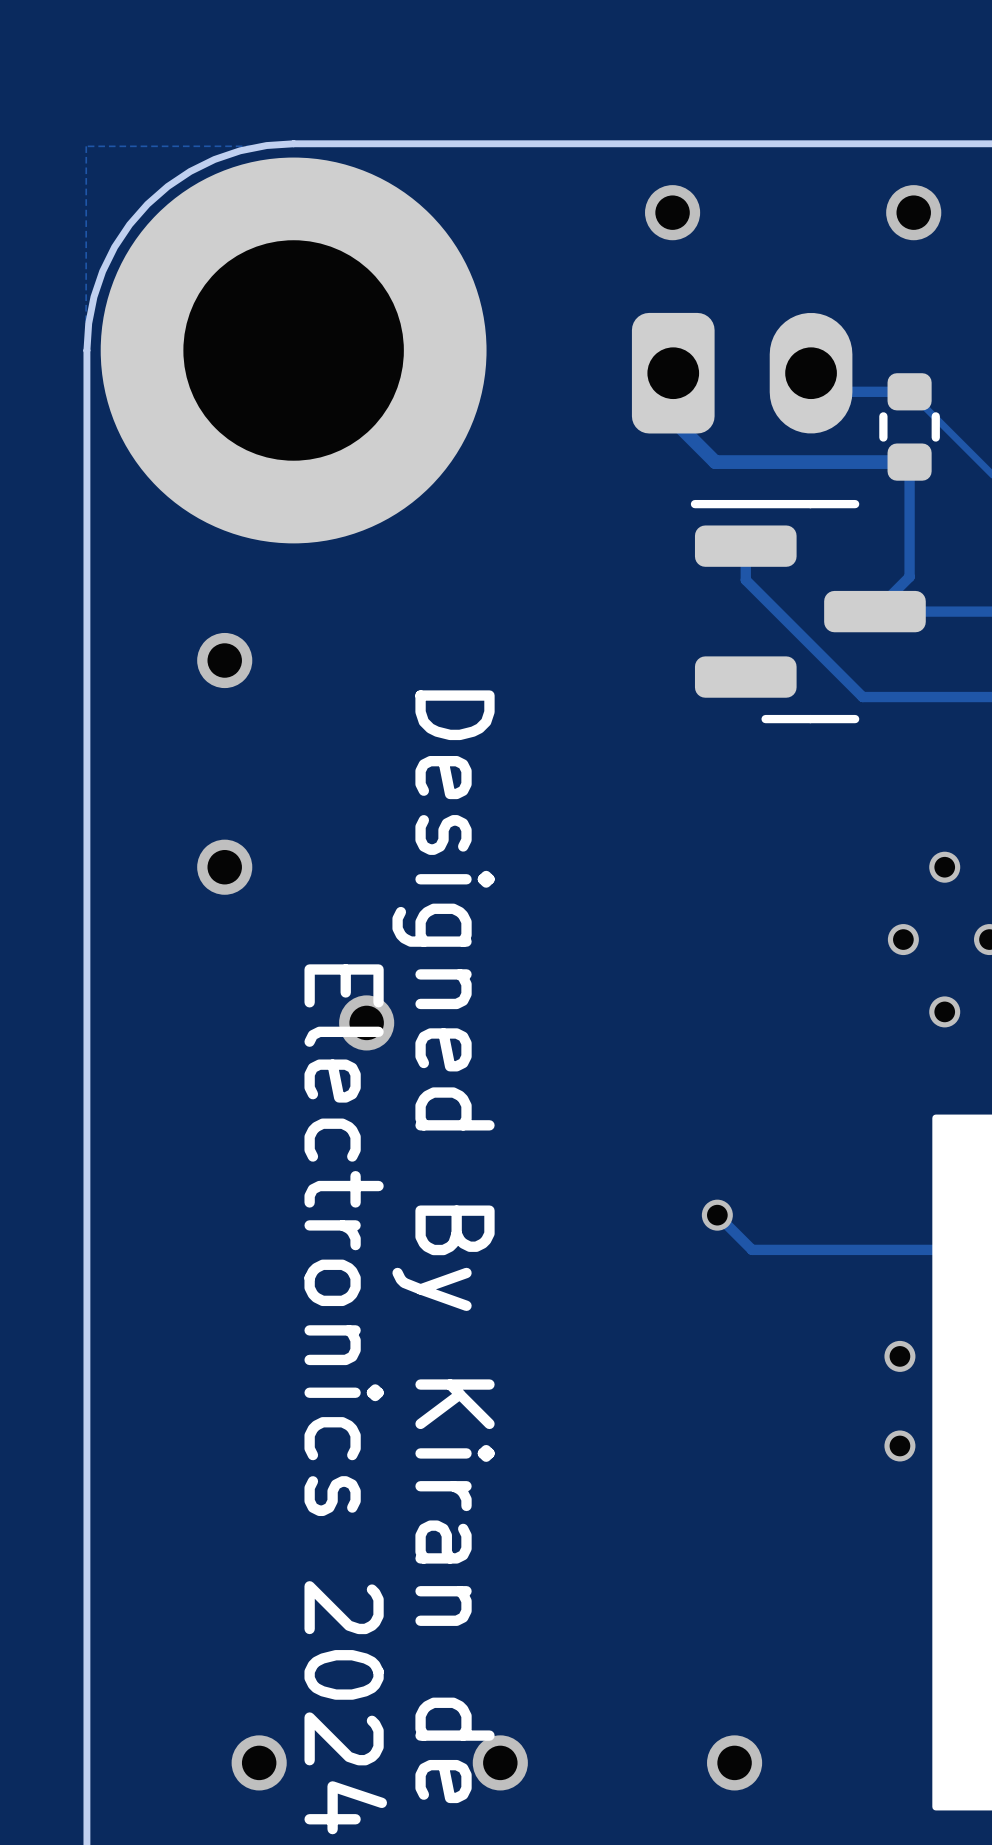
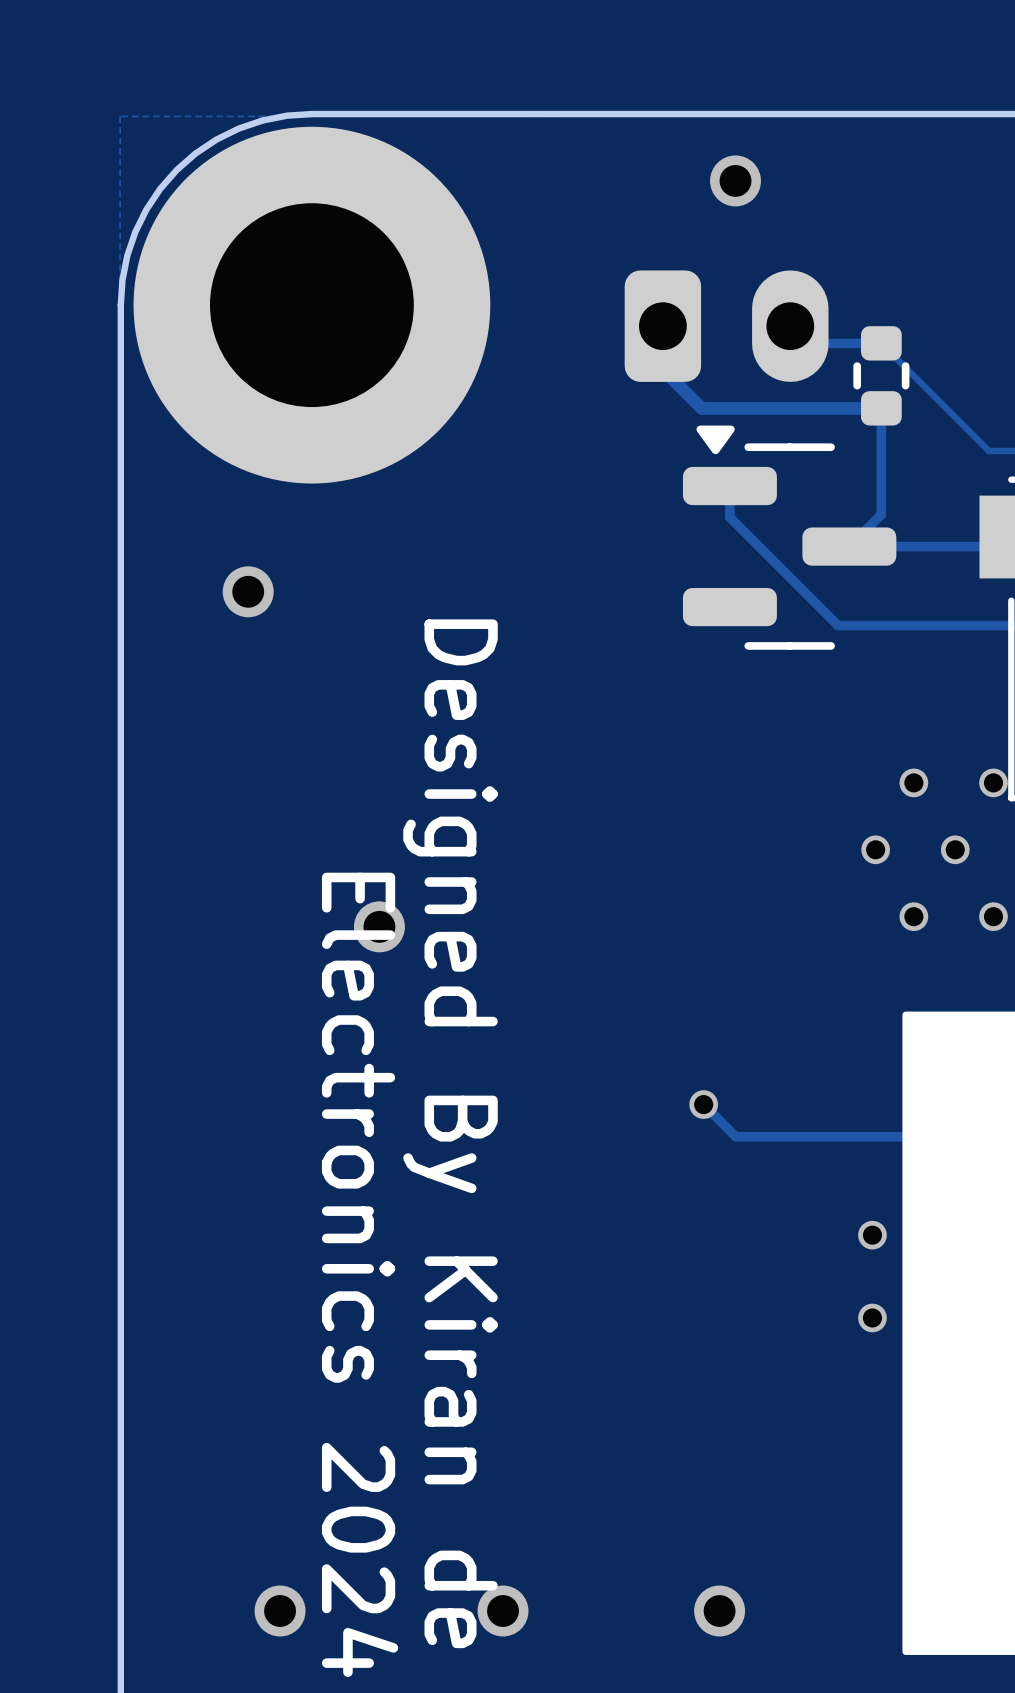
via position: (672, 212) -> (735, 180)
via: (913, 212) -> none
part footprint: [690, 499, 926, 724] -> [682, 425, 897, 650]
via: (224, 867) -> none

